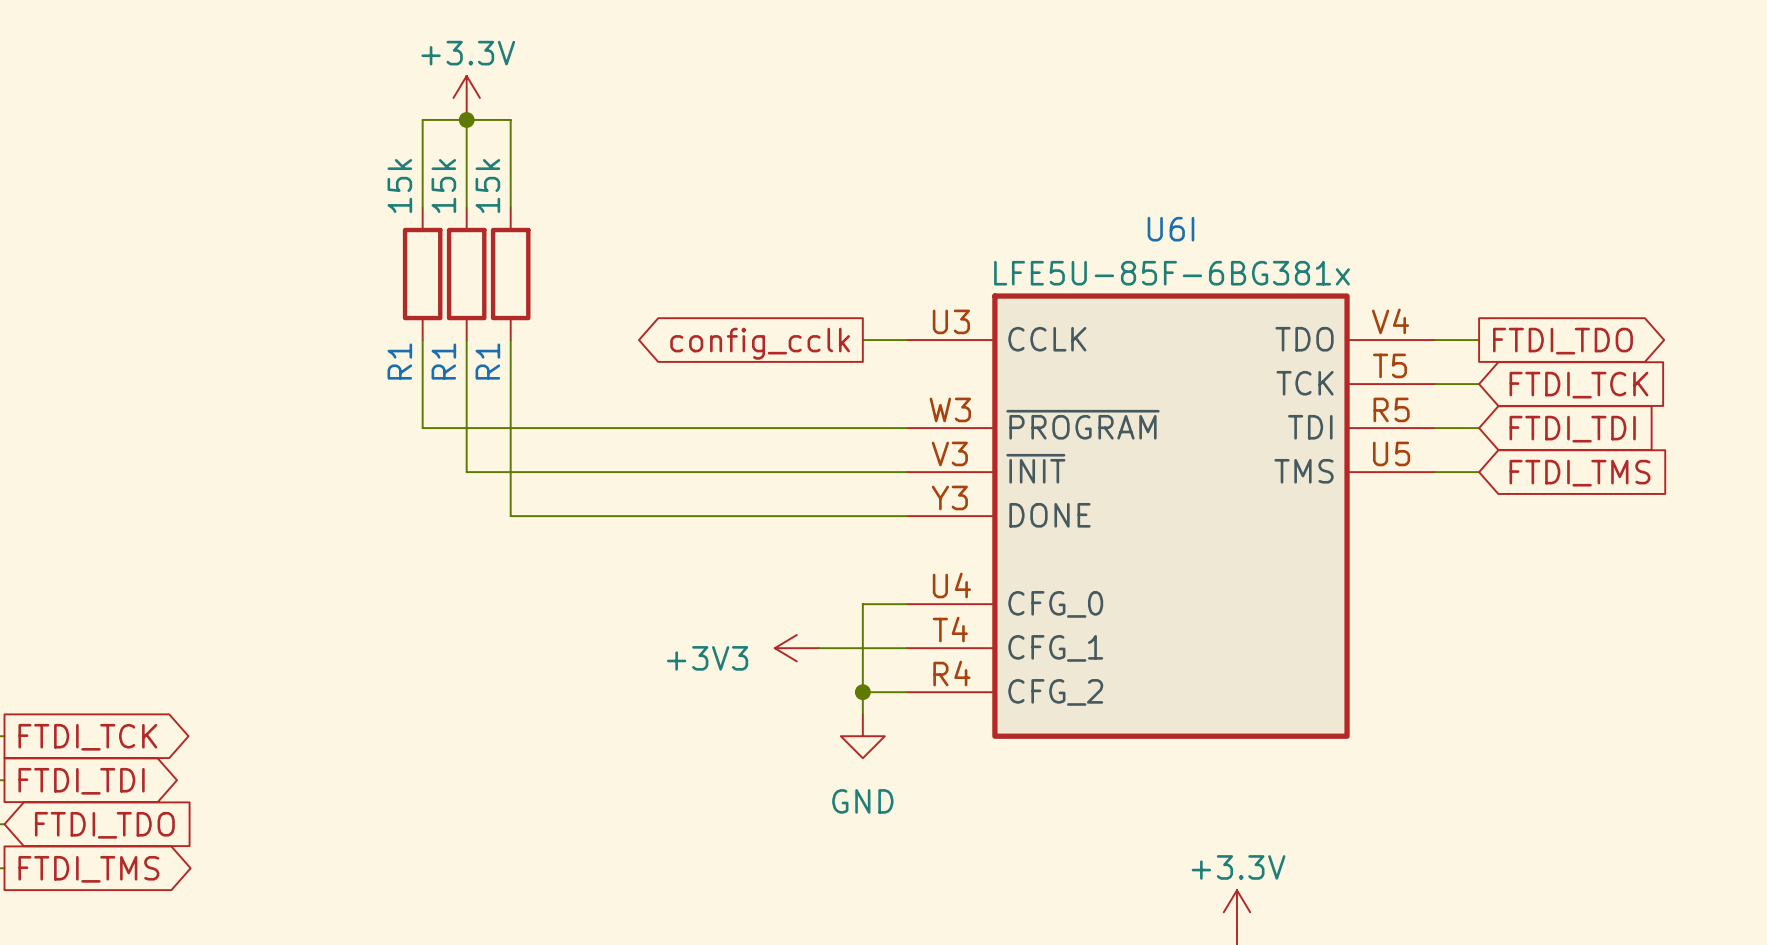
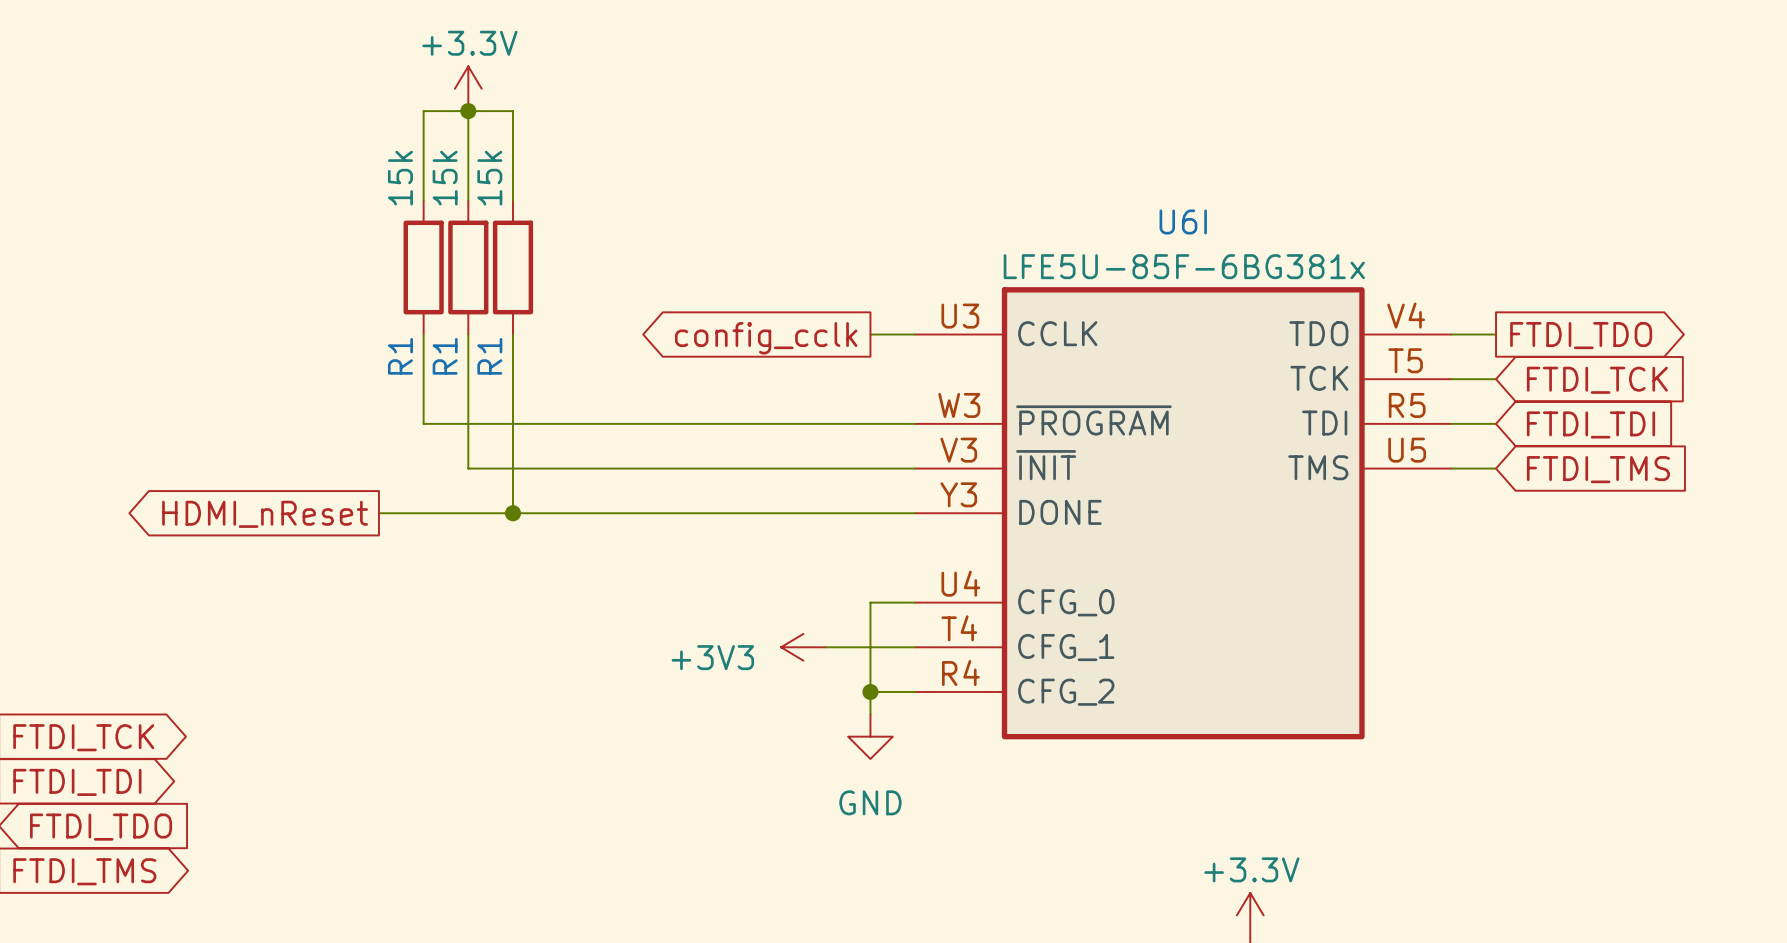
wire: none -> (378, 513) (513, 513)
junction: none -> (513, 513)
global label: none -> HDMI_nReset (265, 514)

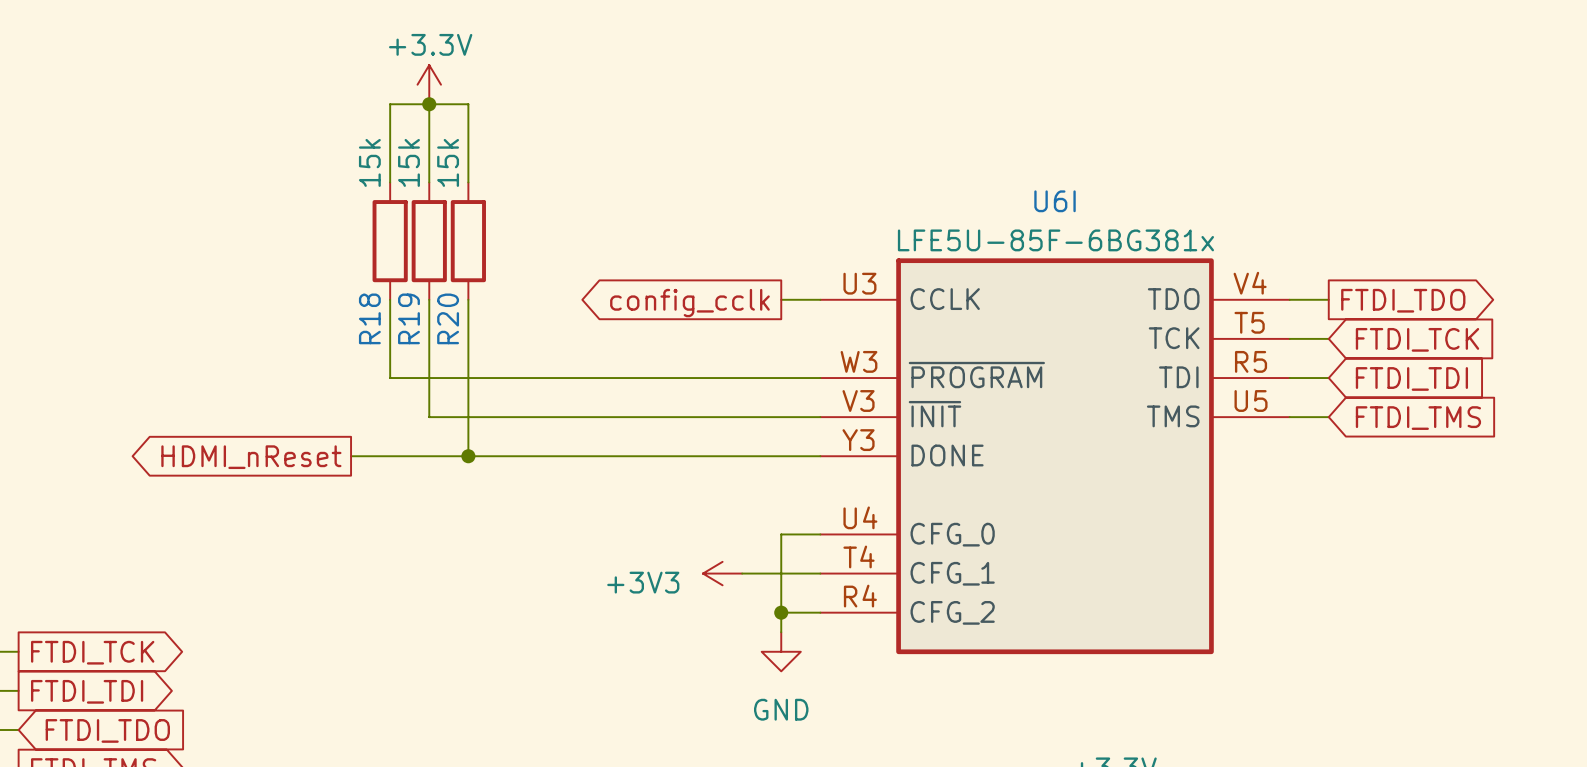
R1 name: R1 (400, 356) -> R18 (369, 318)
R1 name: R1 (445, 356) -> R19 (408, 318)
R1 name: R1 (489, 356) -> R20 (448, 318)

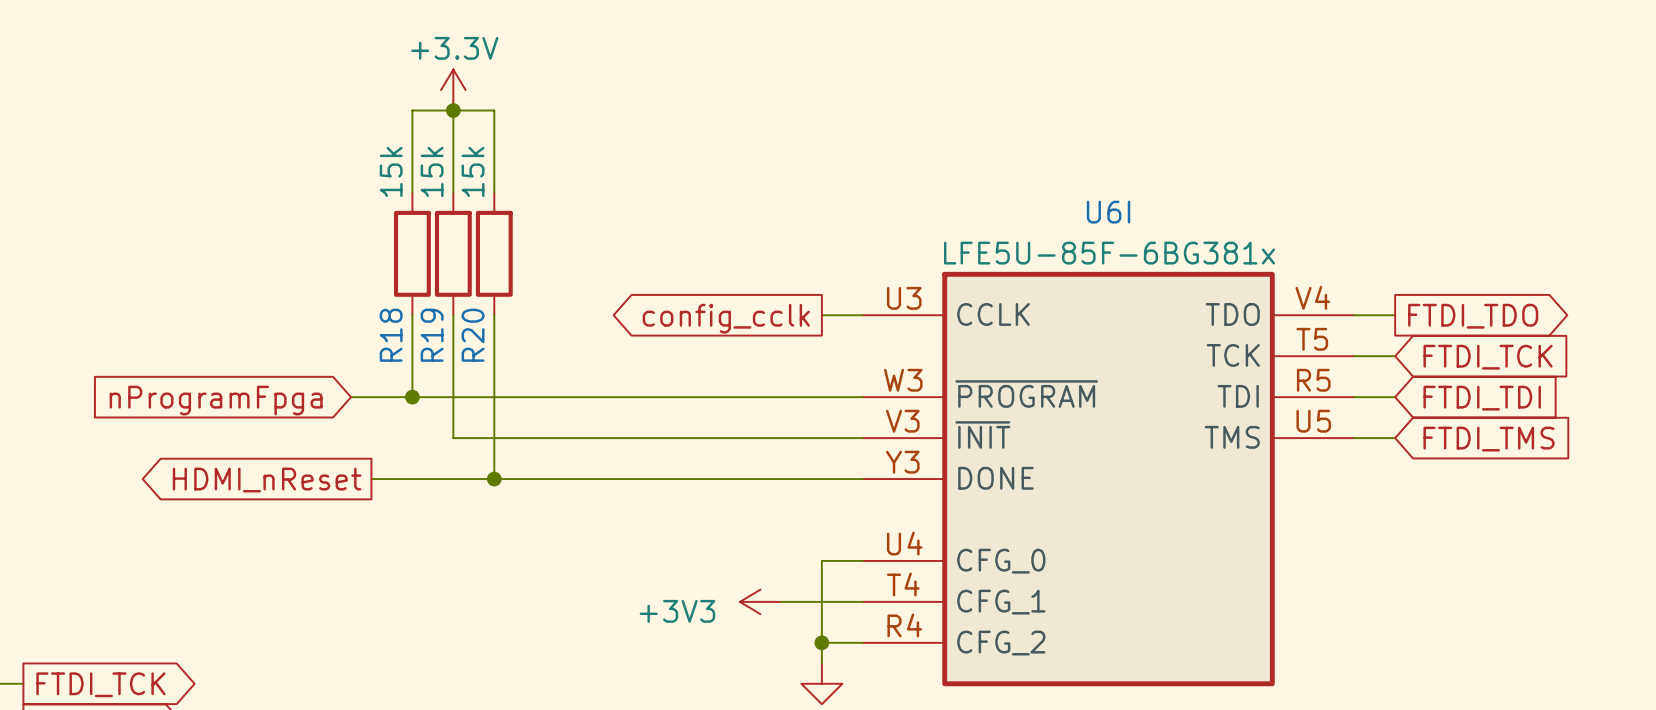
wire: none -> (350, 397) (412, 397)
junction: none -> (412, 397)
global label: none -> nProgramFpga (216, 400)

